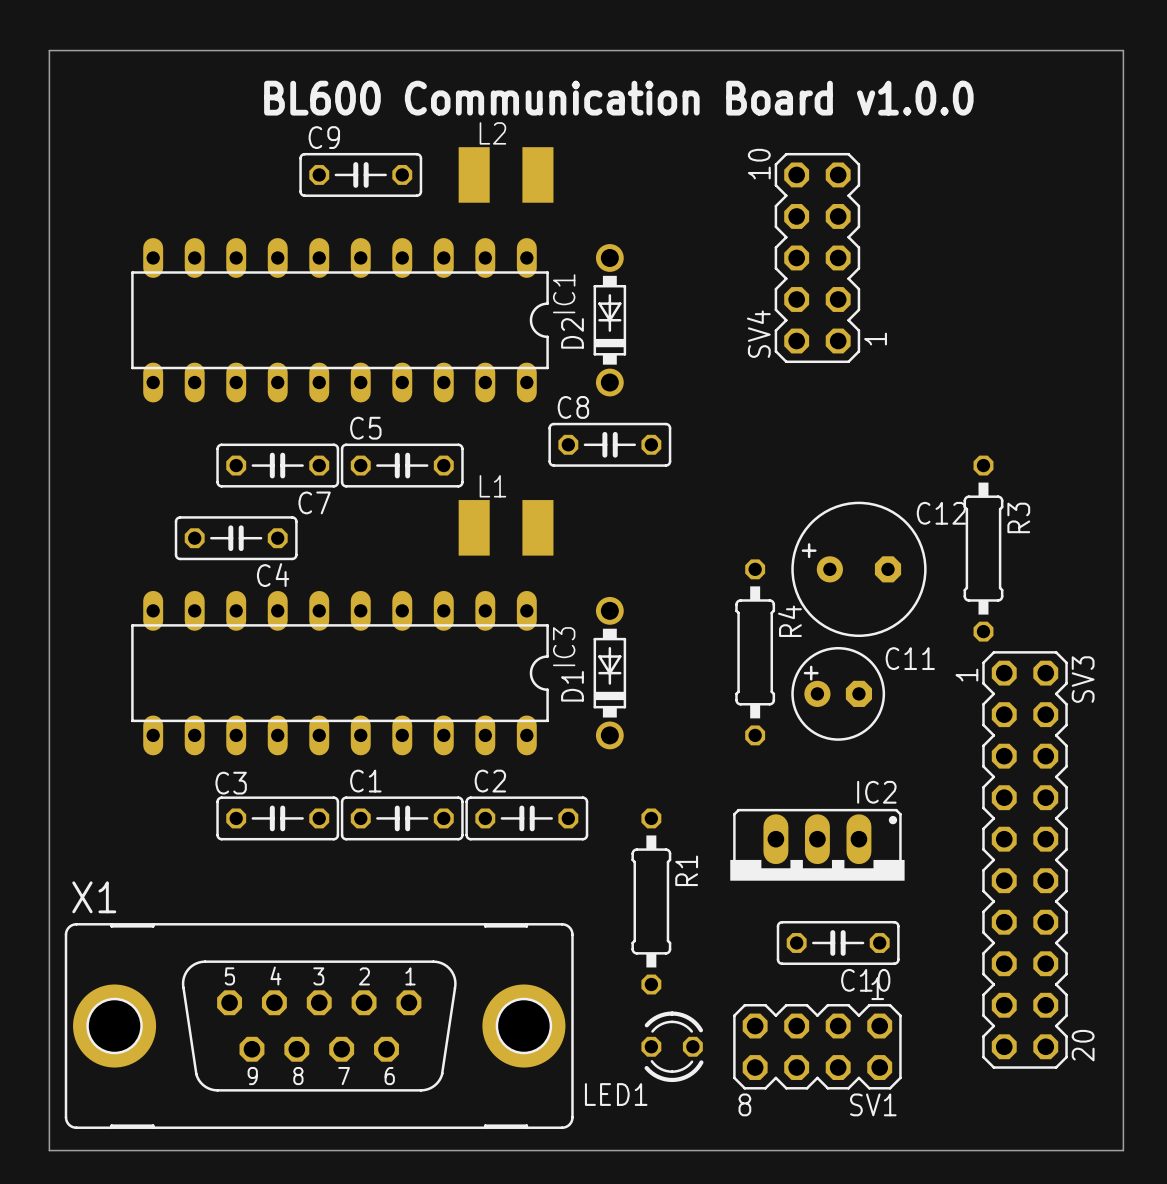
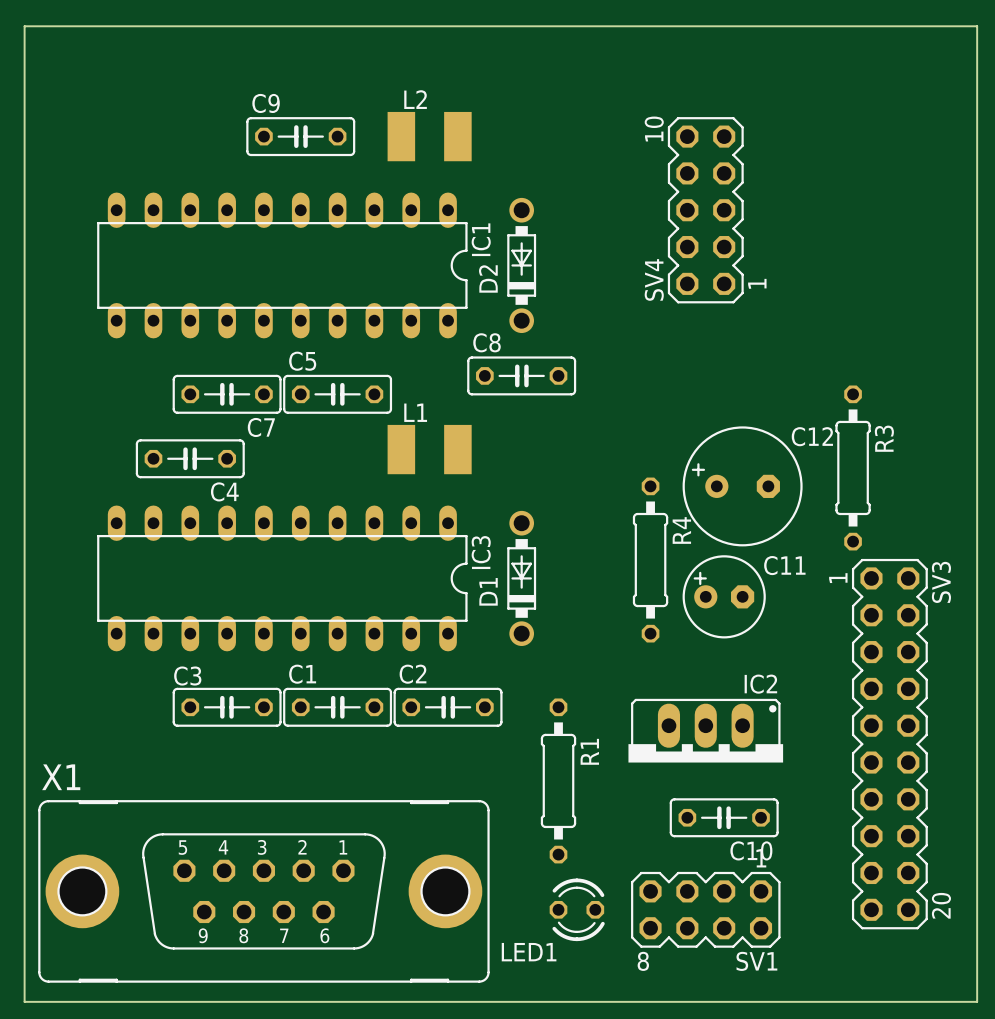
text: BL600 Communication Board v1.0.0 (618, 98) -> none

